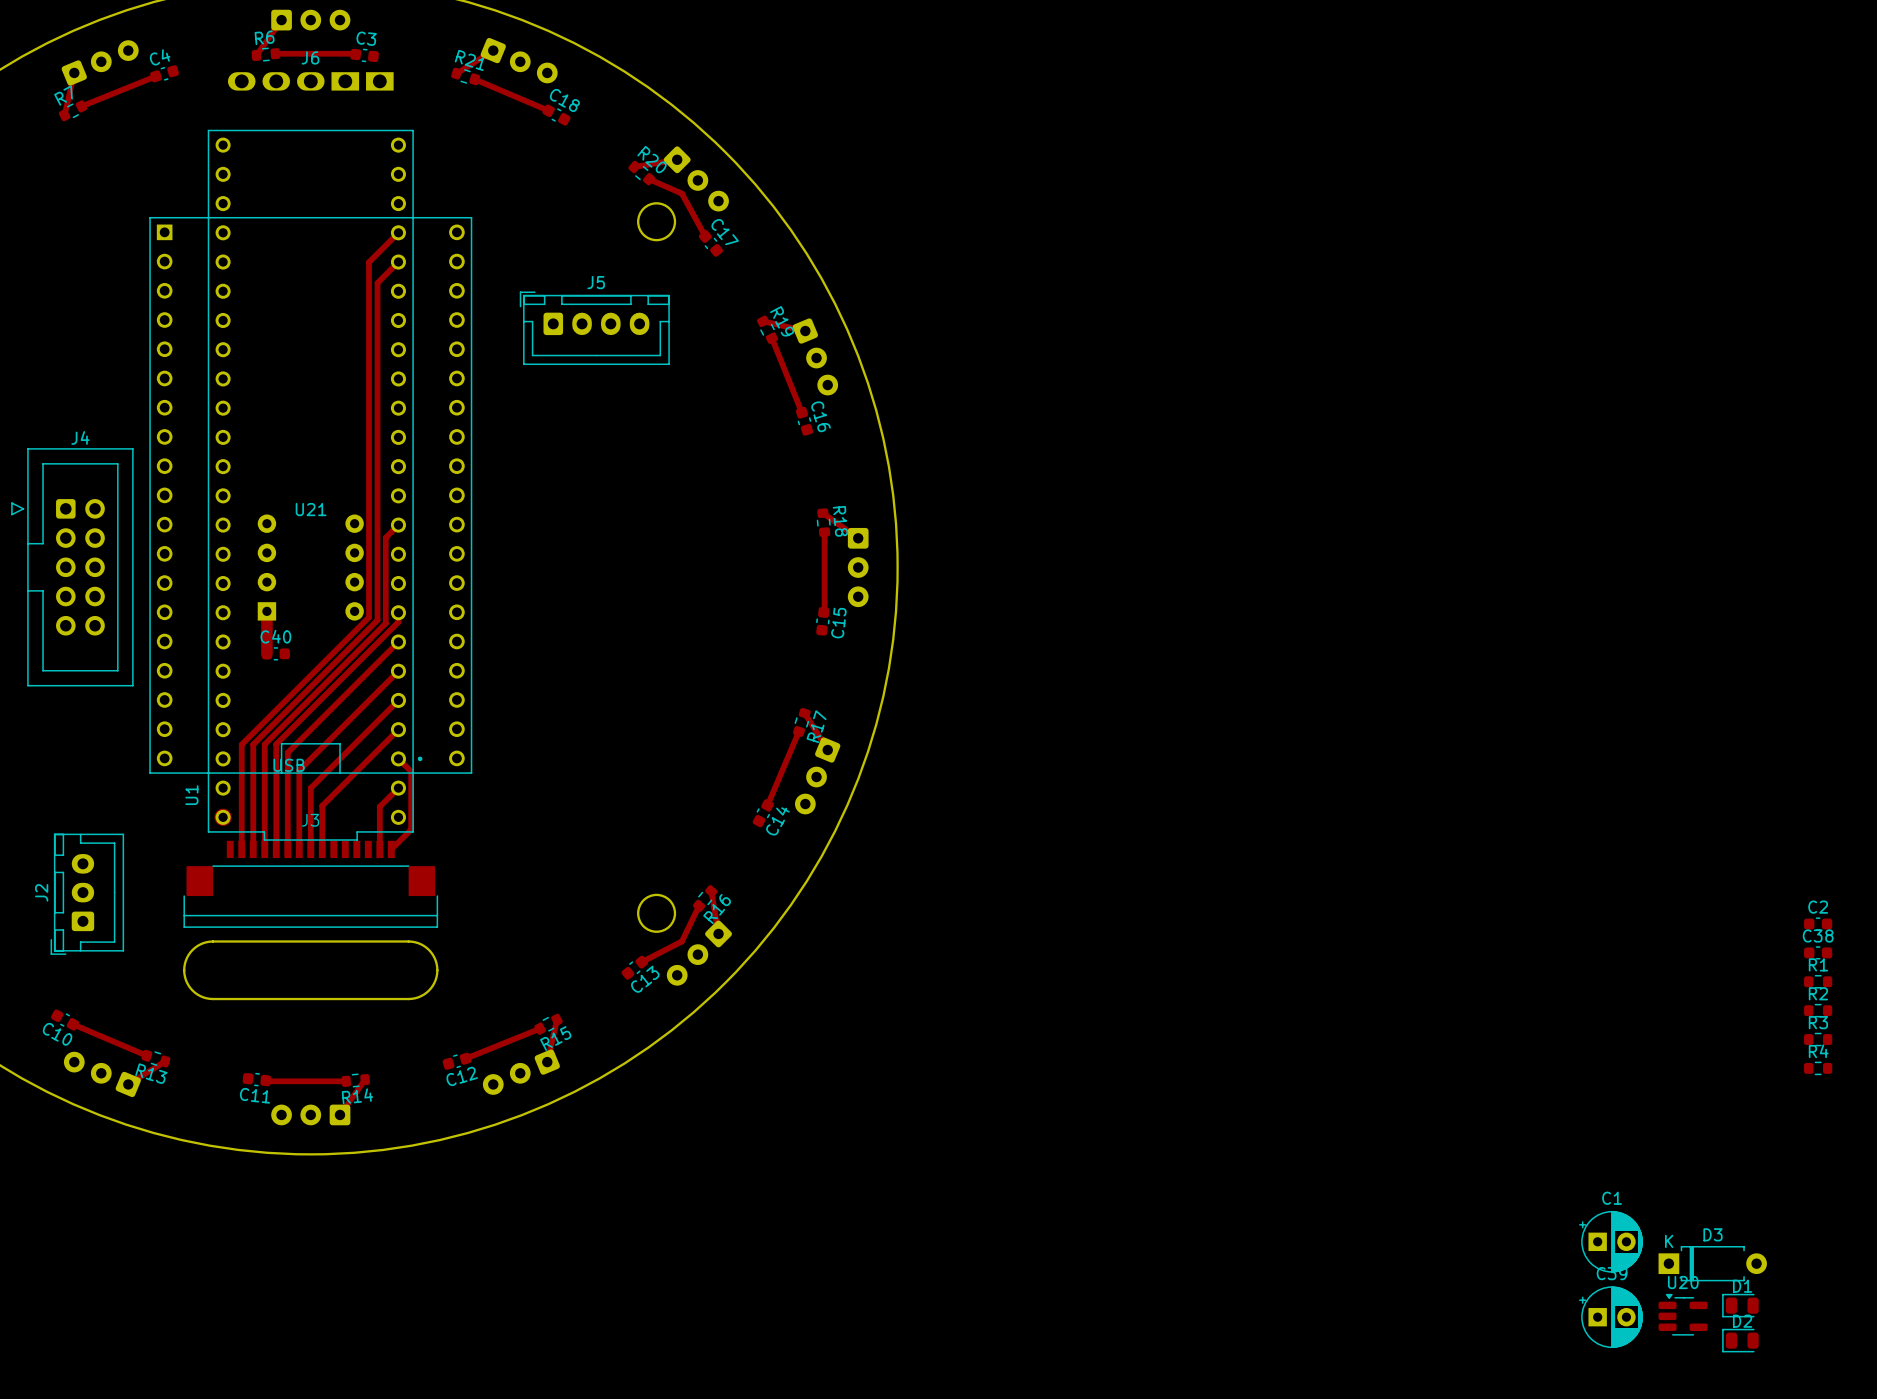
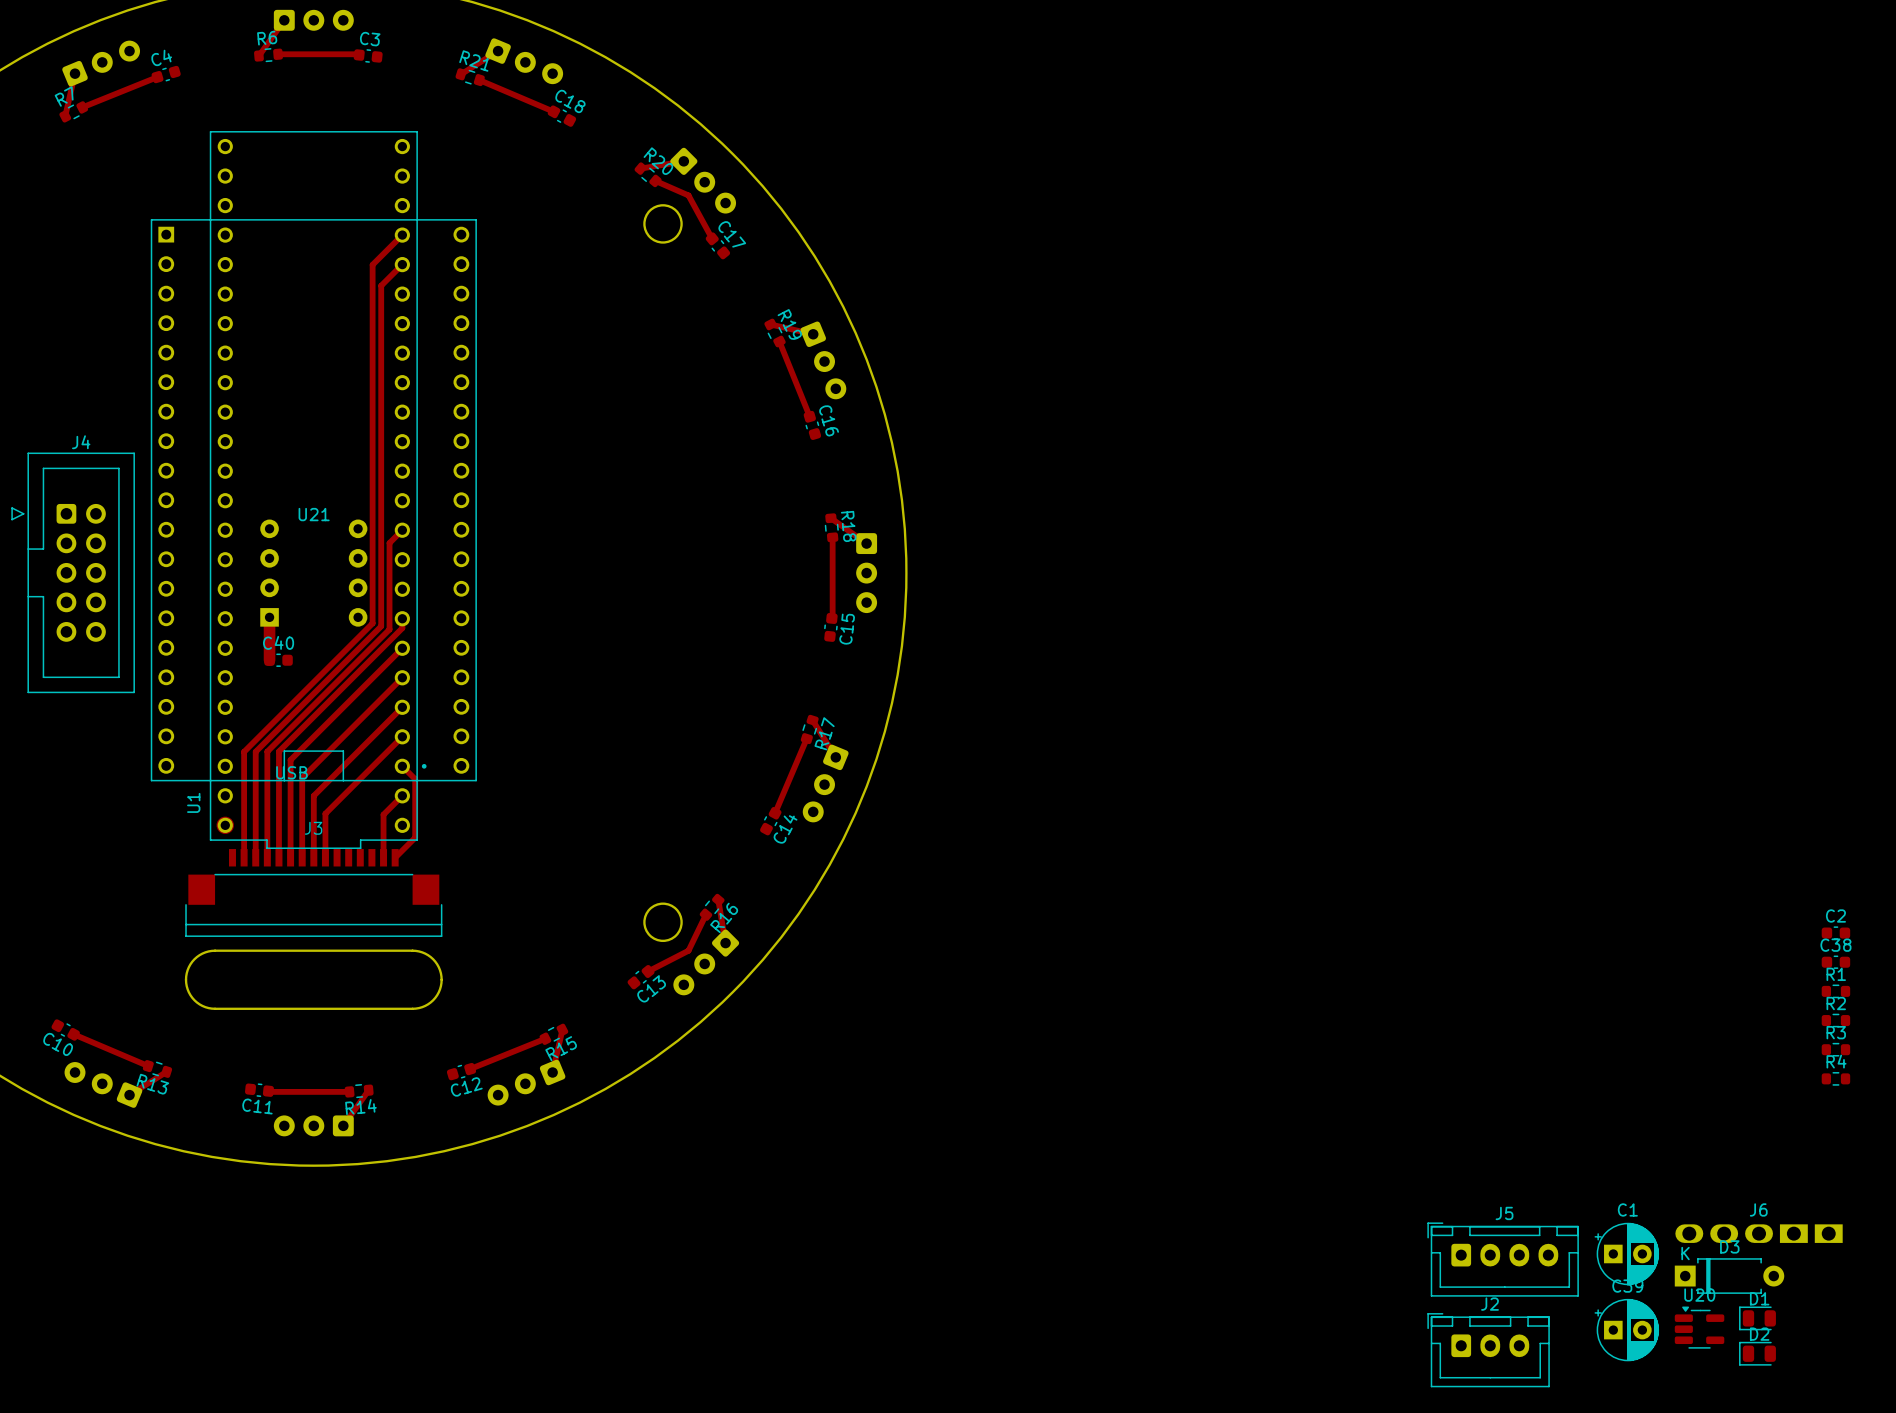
J6 position: (310, 81) -> (1759, 1233)
J5 position: (594, 328) -> (1503, 1259)
J2 rotation: 0° (87, 894) -> 90° clockwise (1488, 1350)
J2 position: (87, 894) -> (1488, 1350)

